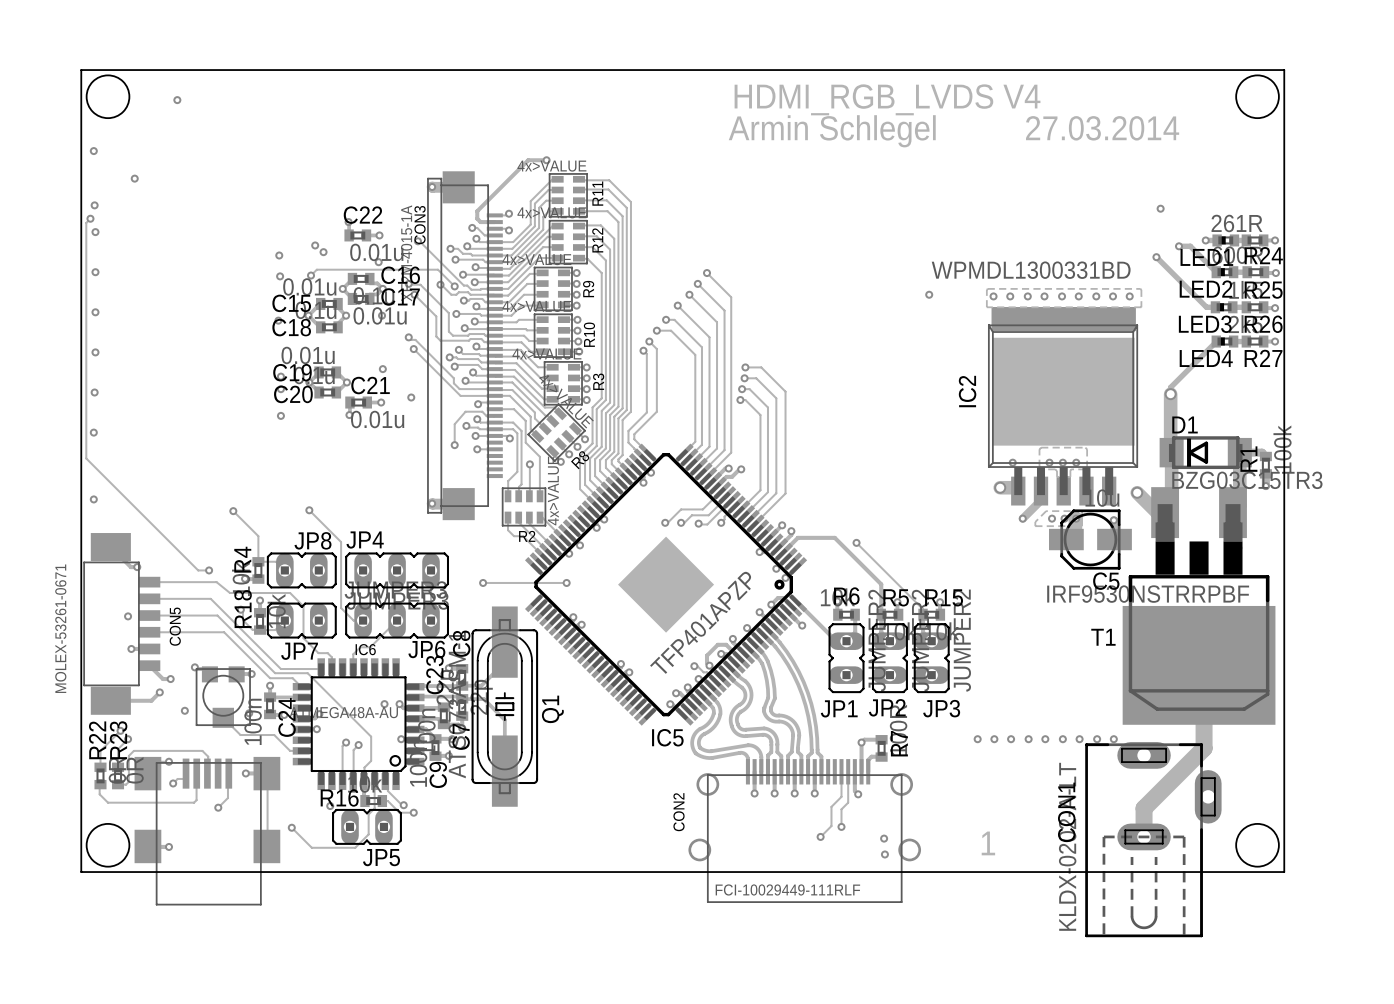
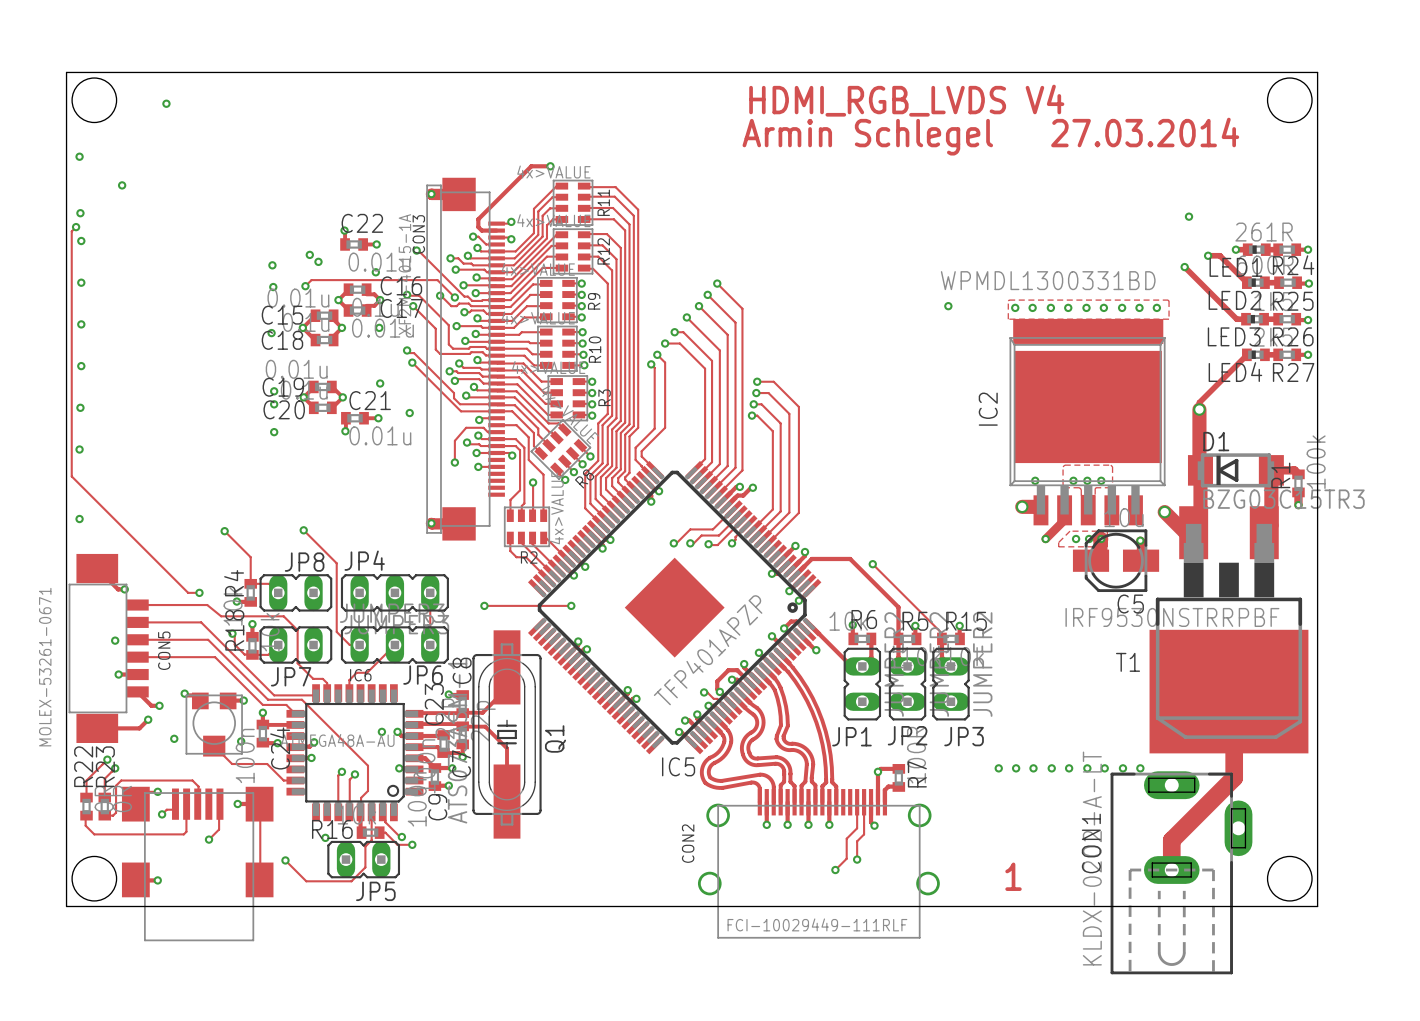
via: (884, 838) -> none
via: (884, 854) -> none

